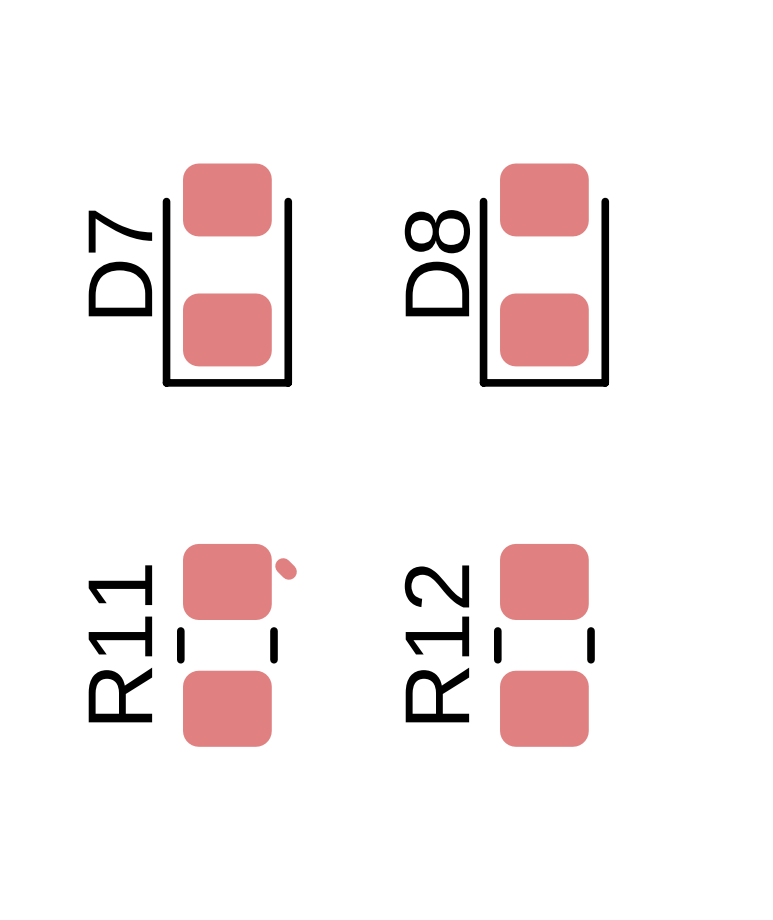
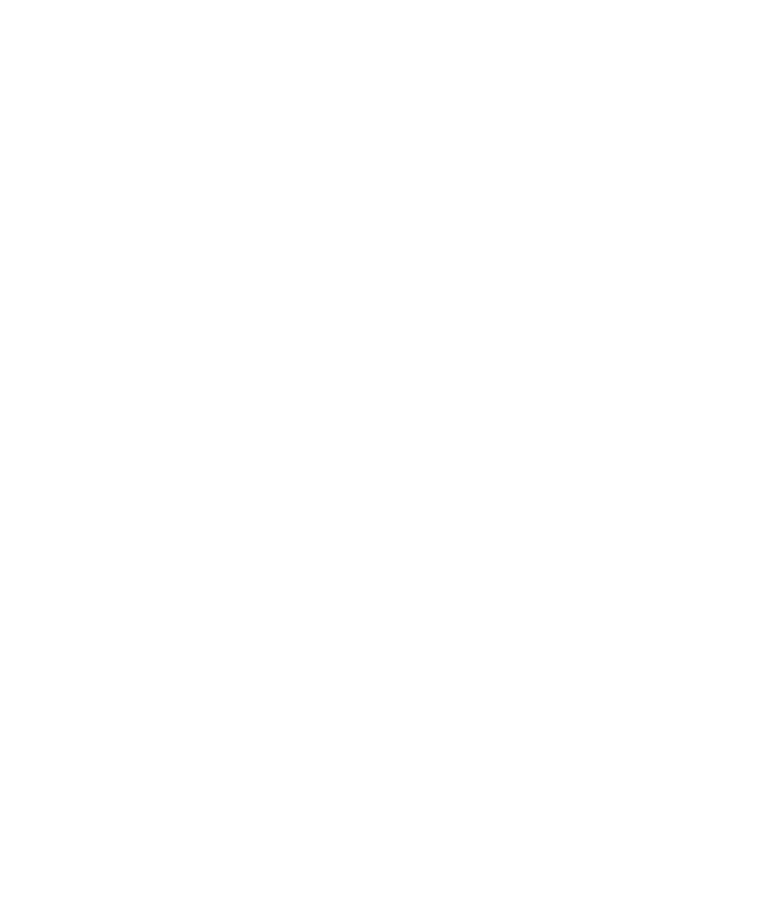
D7: (227, 275) -> none
D8: (544, 275) -> none
top track: (283, 566) (288, 571) -> none
R11: (227, 645) -> none
R12: (544, 645) -> none

